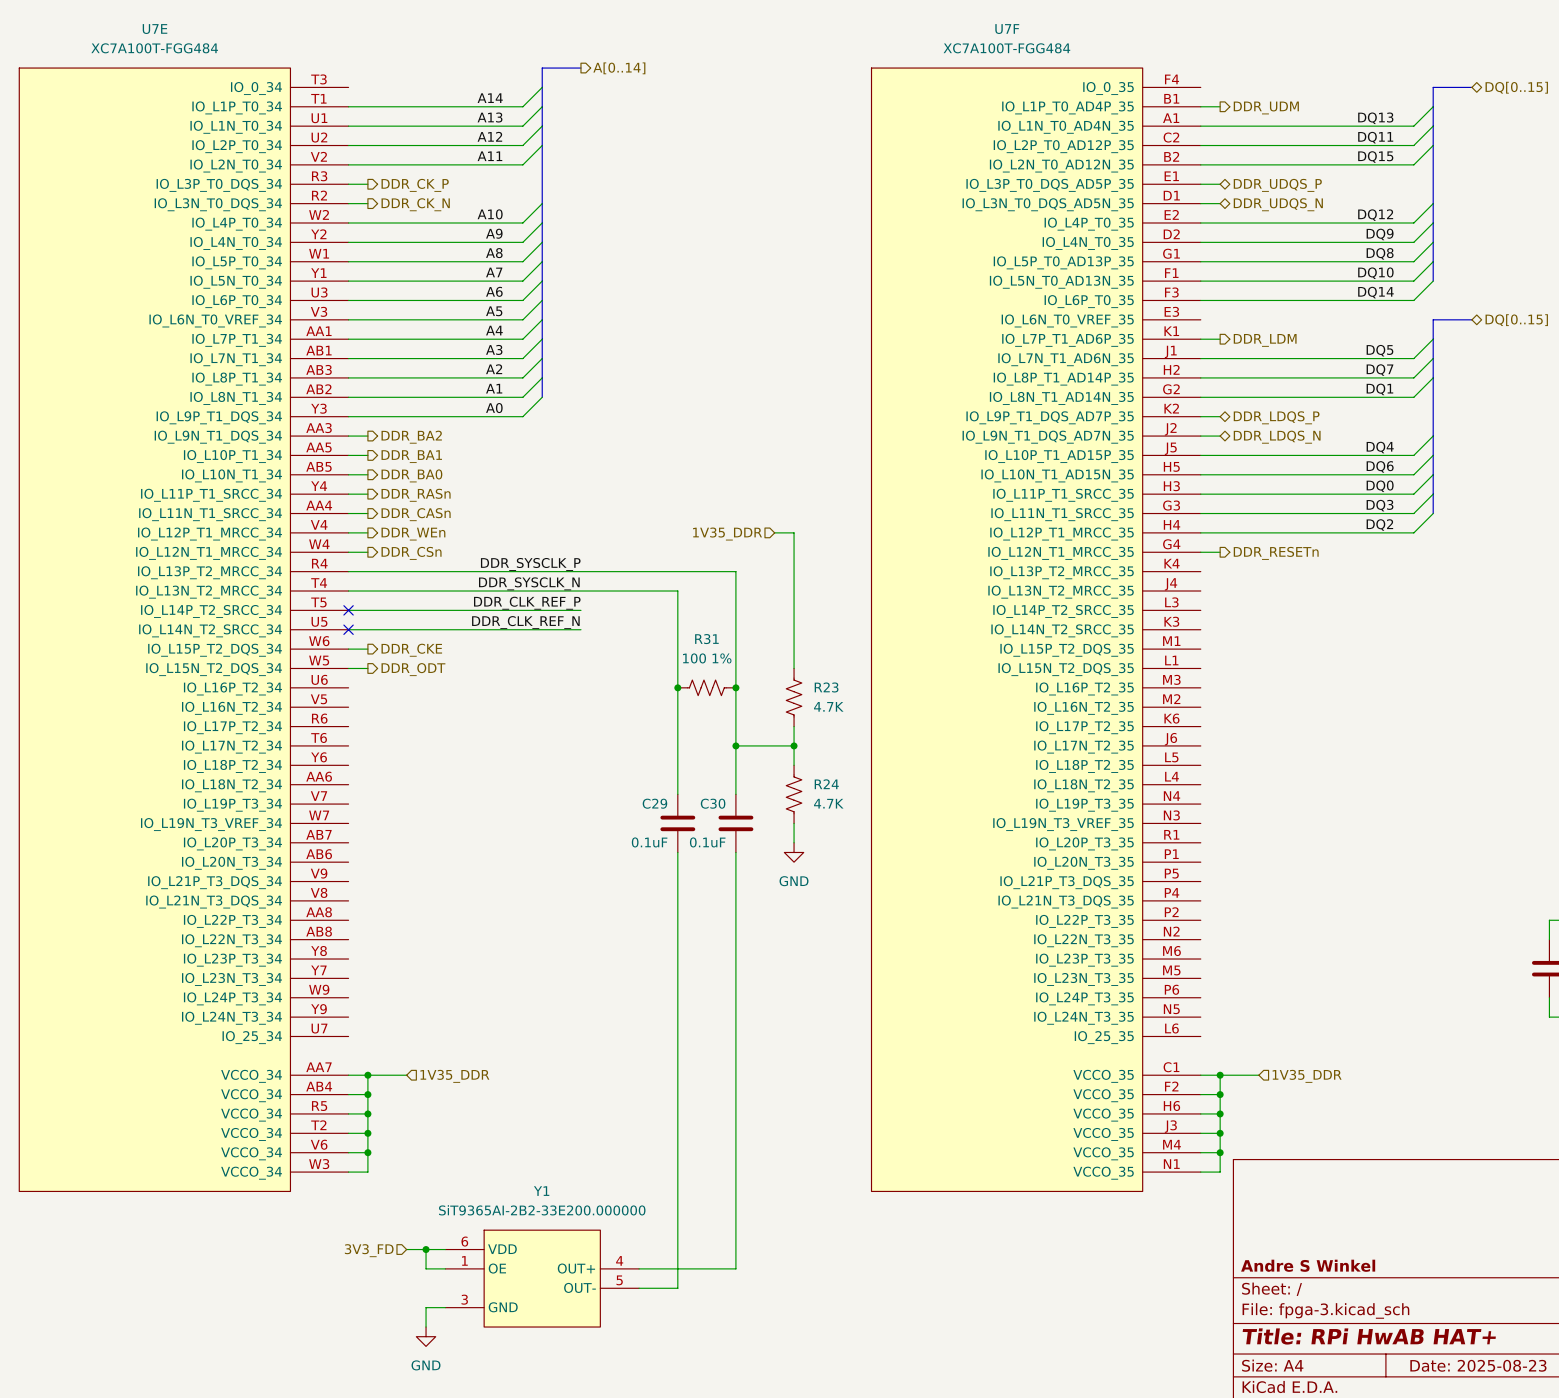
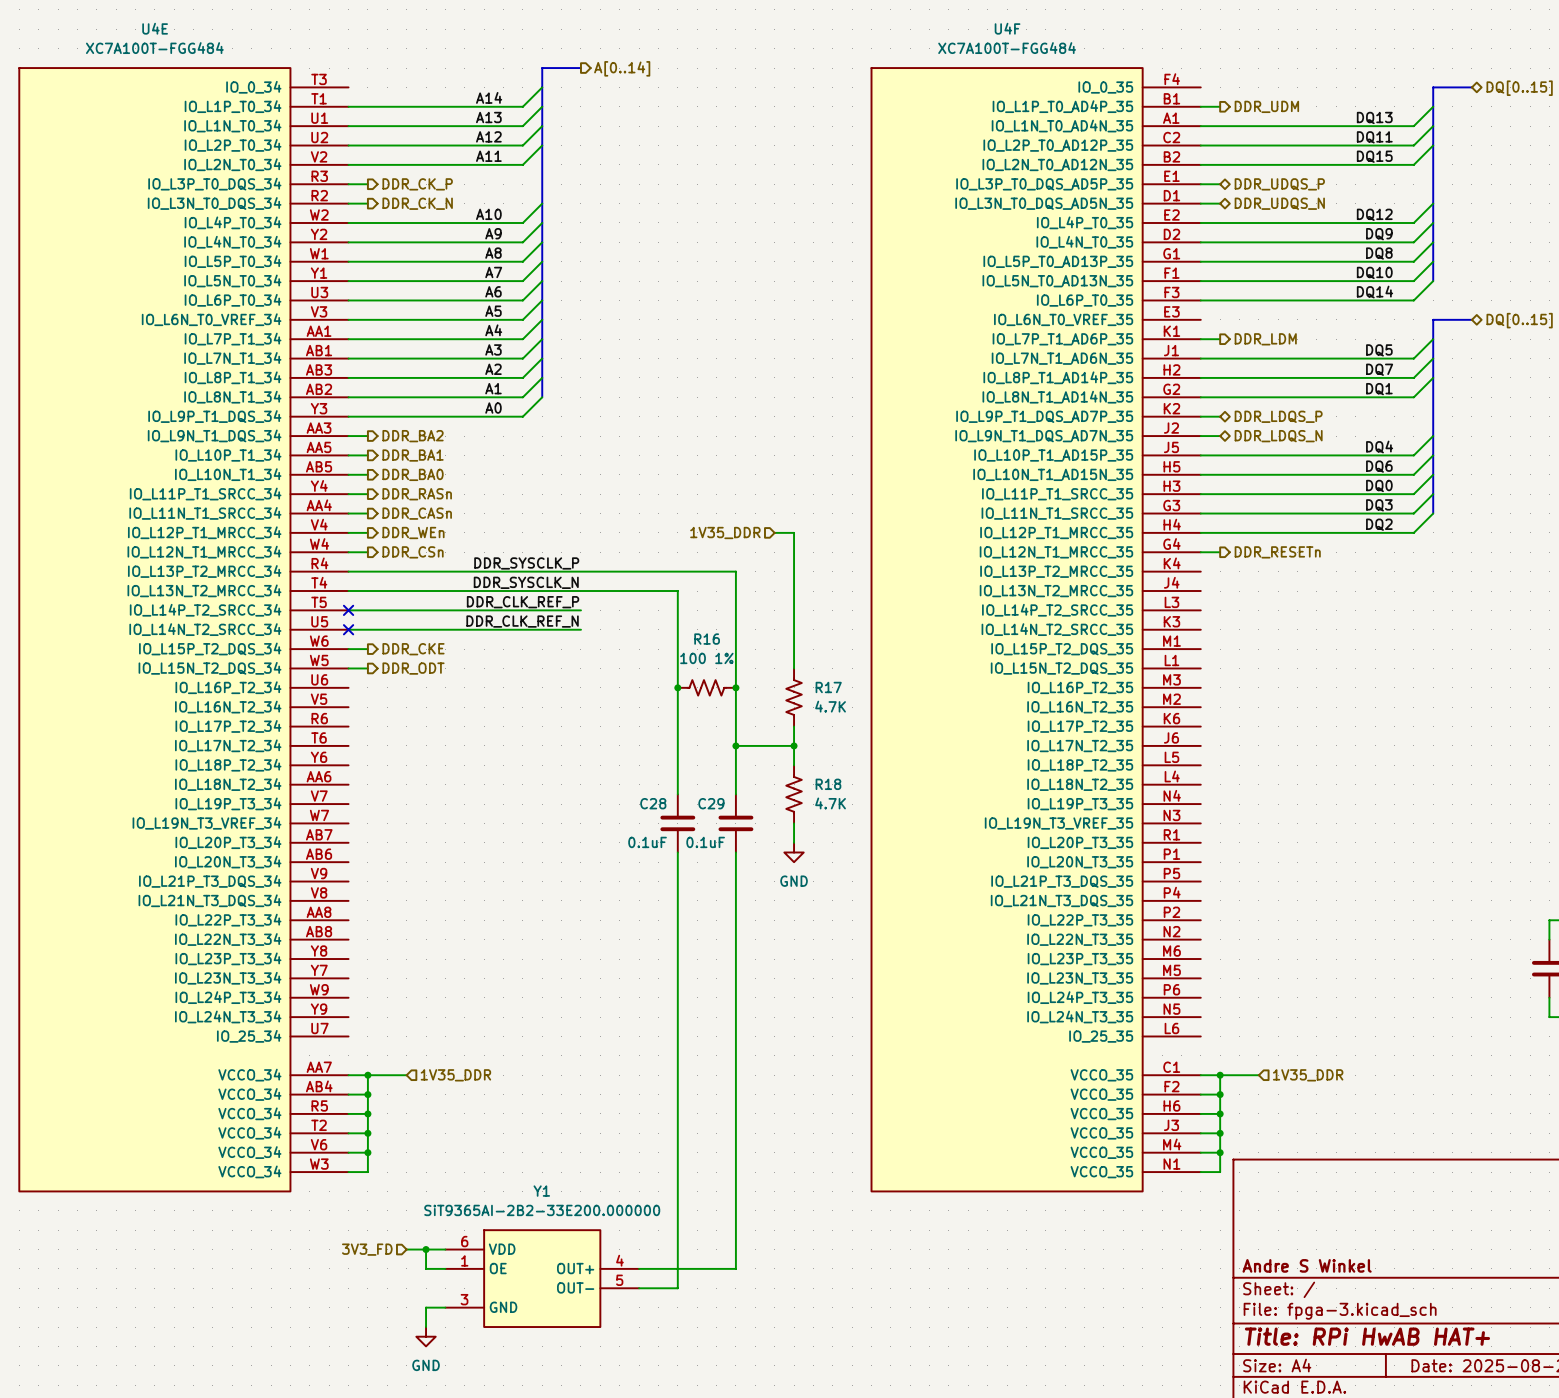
U7E name: U7E (155, 29) -> U4E (155, 28)
U7F name: U7F (1007, 29) -> U4F (1007, 28)
R31 name: R31 (706, 639) -> R16 (707, 639)
R23 name: R23 (826, 687) -> R17 (828, 687)
R24 name: R24 (826, 784) -> R18 (828, 784)
C29 name: C29 (654, 803) -> C28 (653, 803)
C30 name: C30 (713, 803) -> C29 (711, 803)

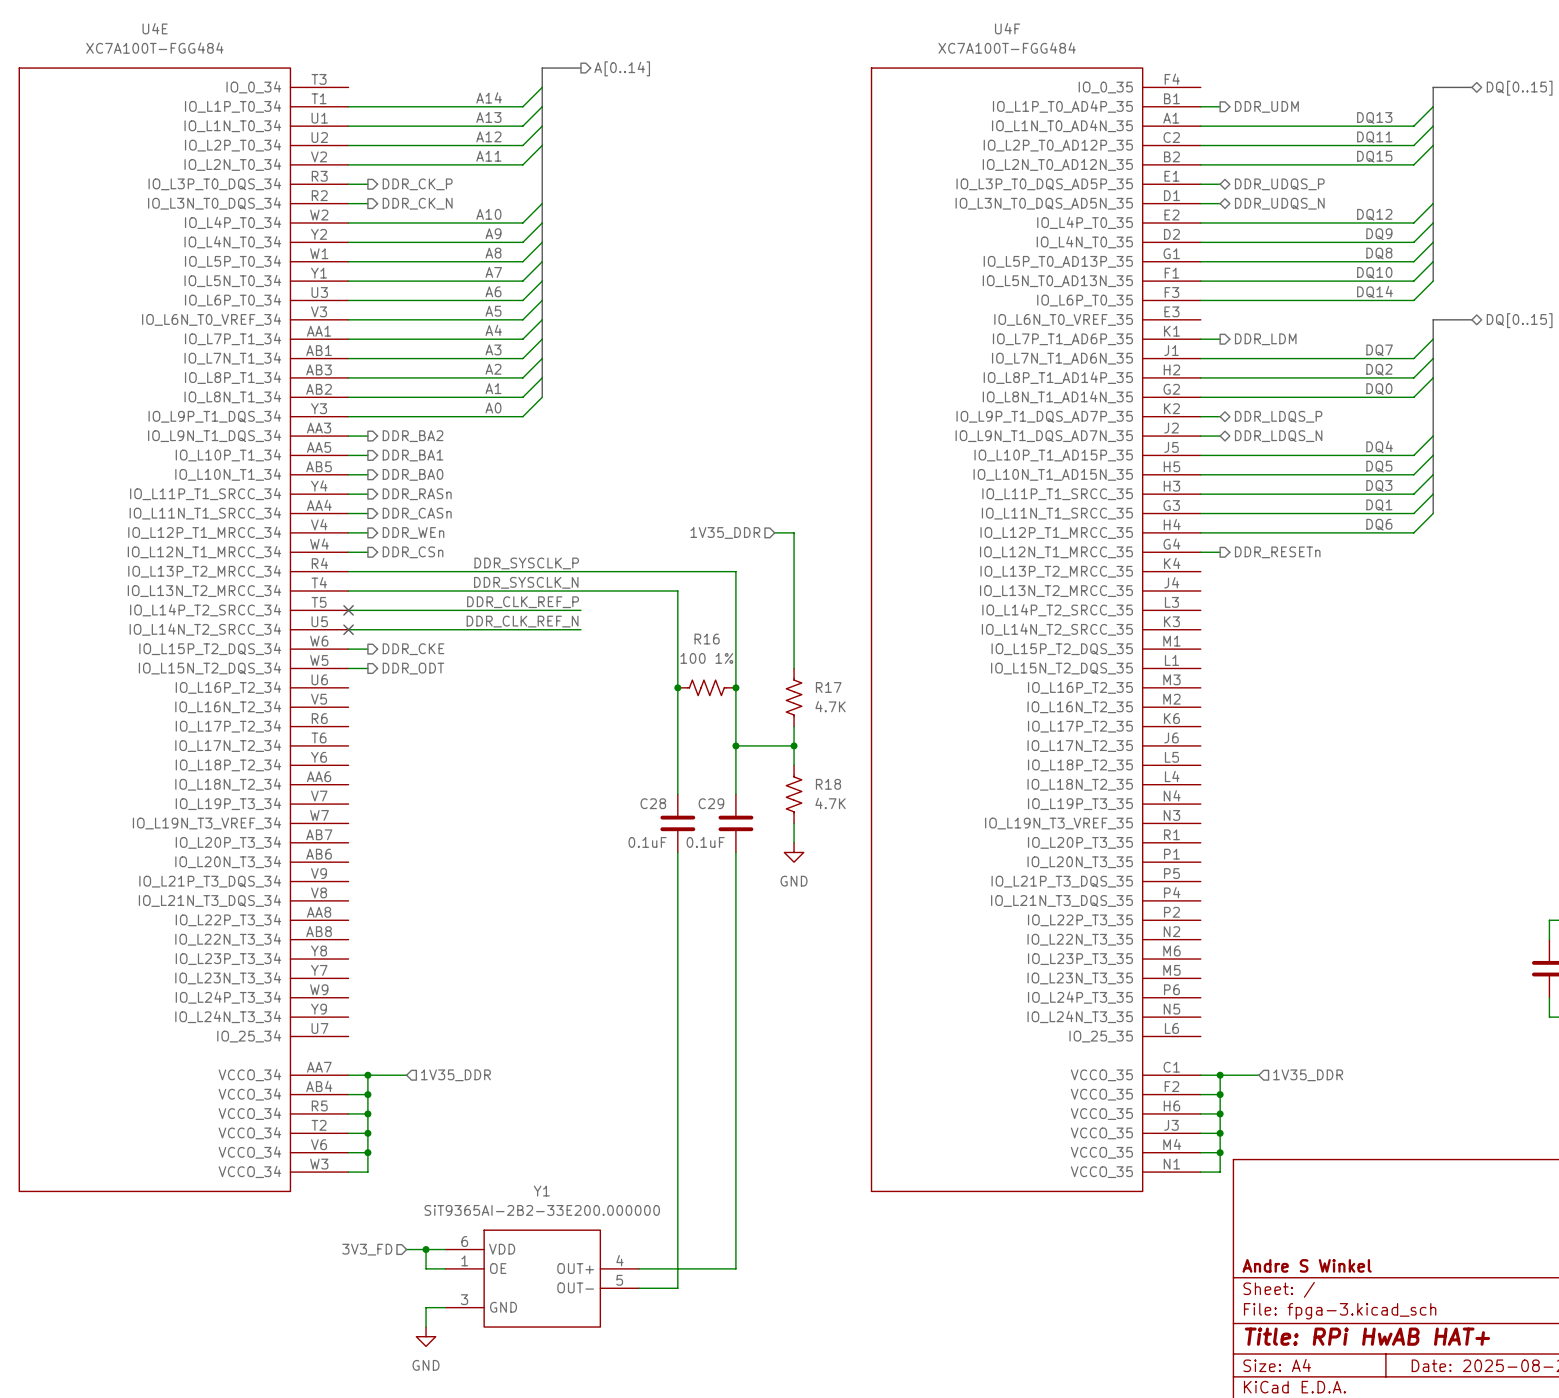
label: DQ5 (1379, 350) -> DQ7 (1379, 350)
label: DQ7 (1379, 369) -> DQ2 (1379, 369)
label: DQ1 (1379, 389) -> DQ0 (1379, 389)
label: DQ6 (1379, 466) -> DQ5 (1379, 466)
label: DQ0 (1379, 485) -> DQ3 (1379, 485)
label: DQ3 (1379, 505) -> DQ1 (1379, 505)
label: DQ2 (1379, 524) -> DQ6 (1379, 524)

